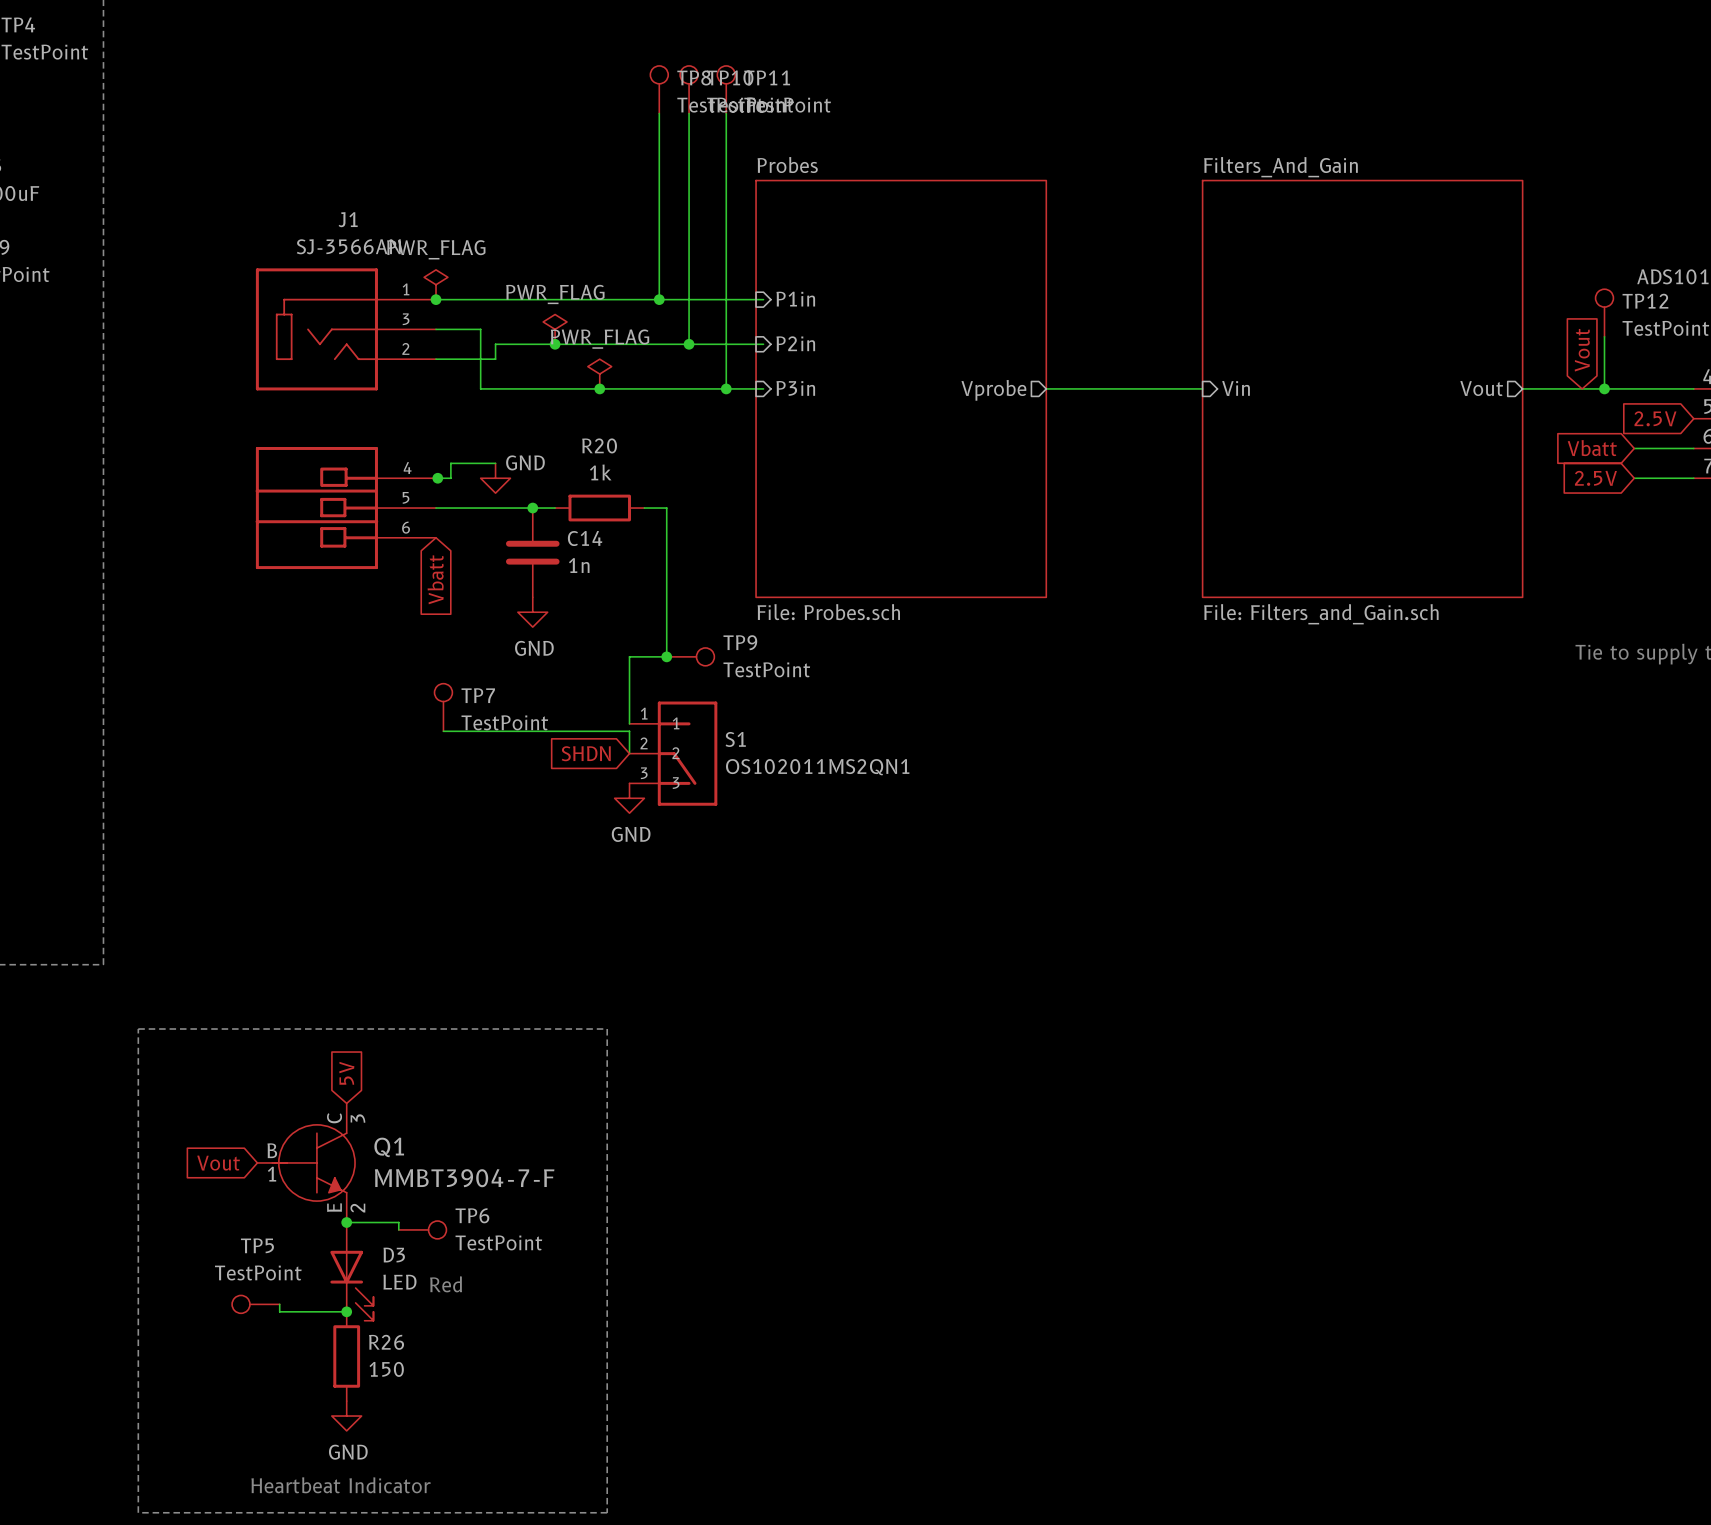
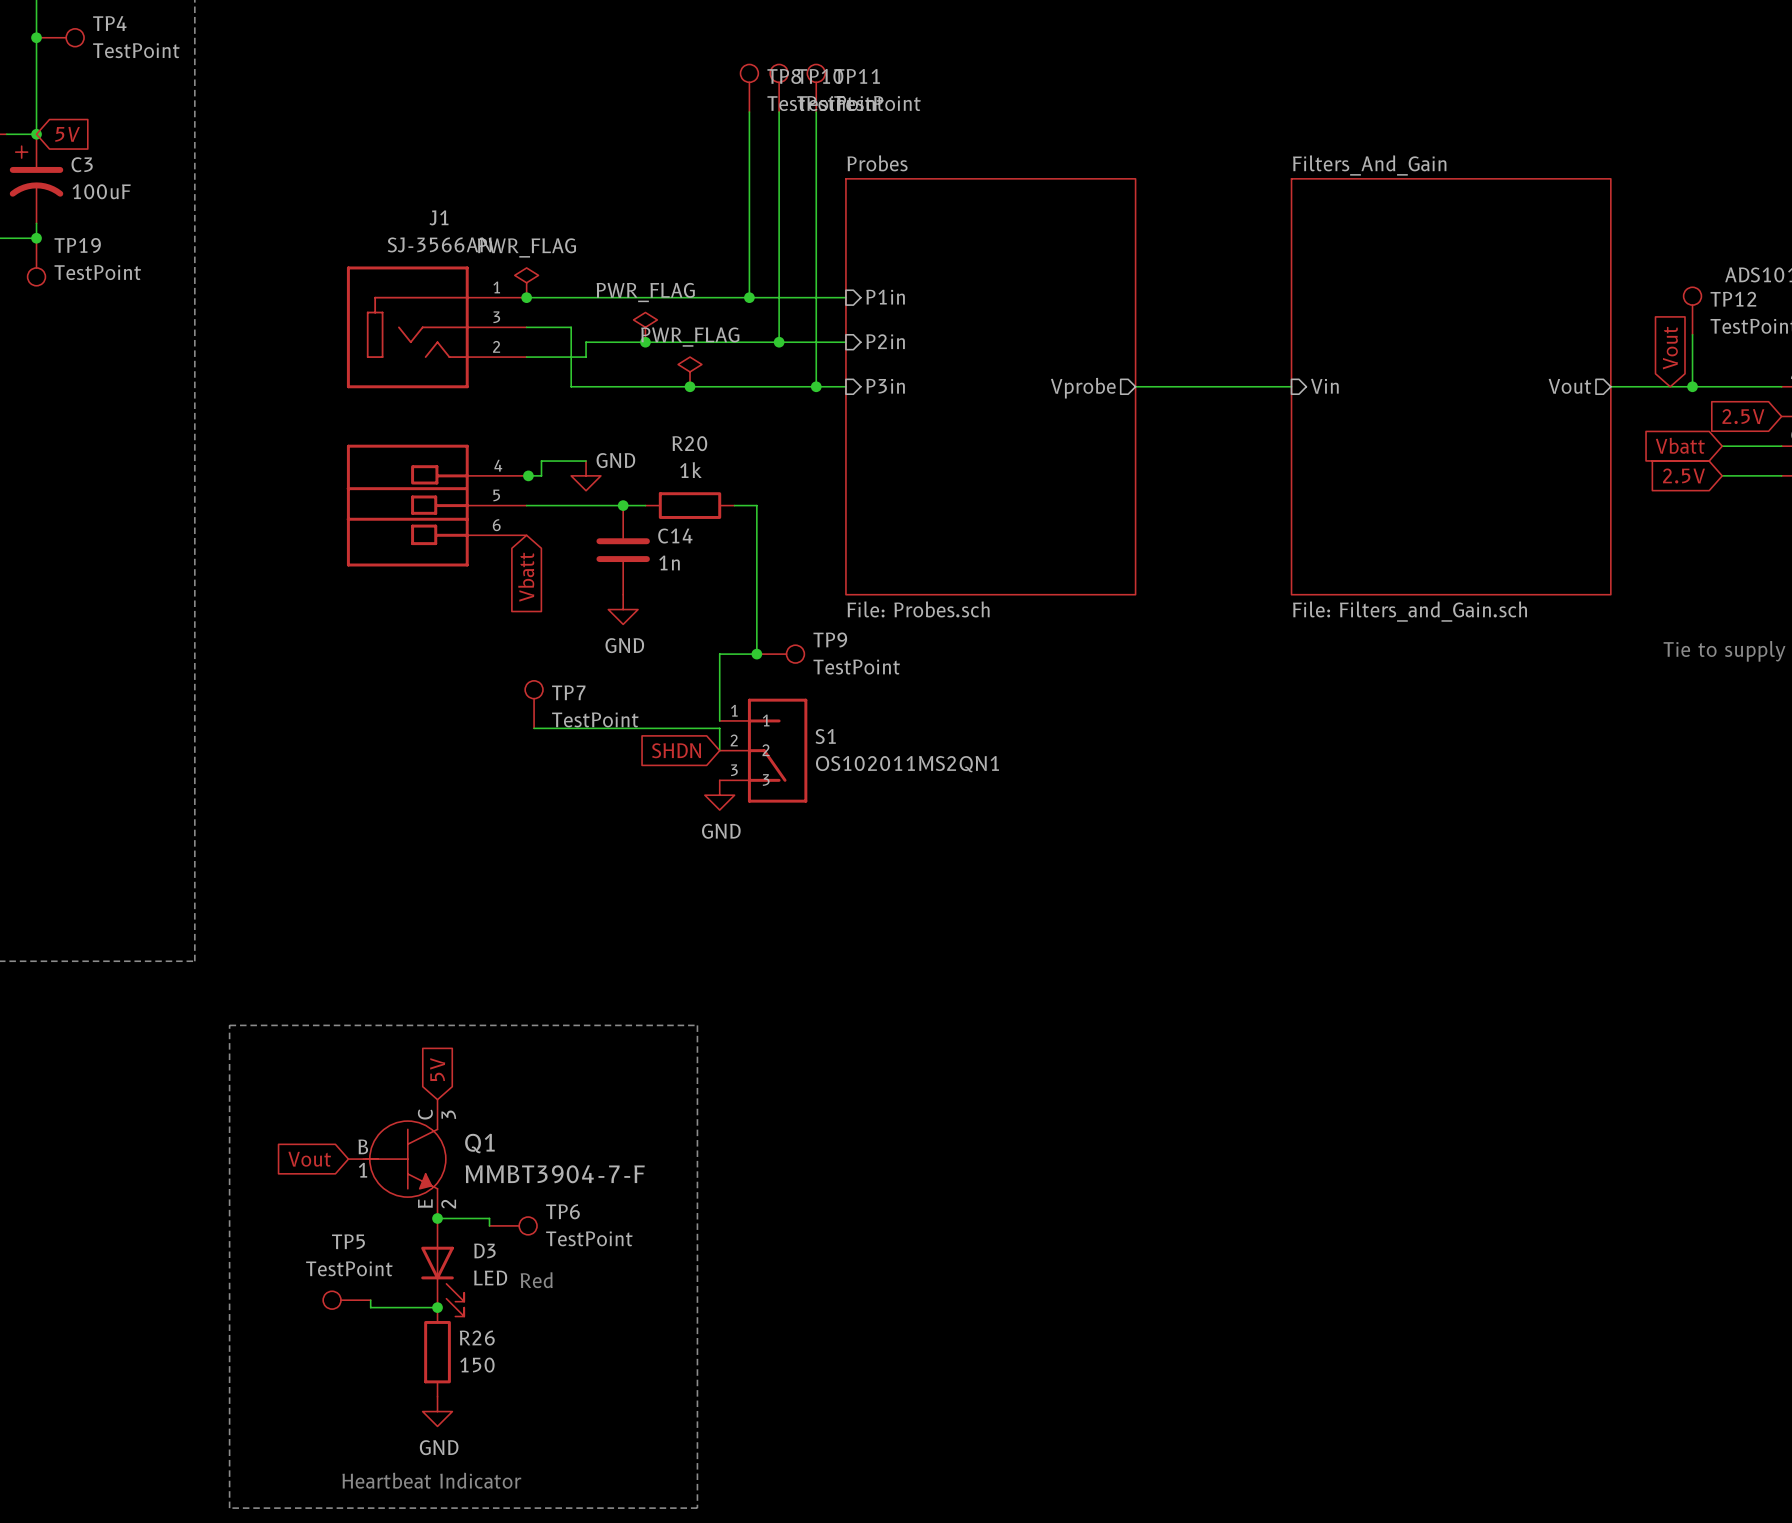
wire: (756, 299) (763, 299) -> none
wire: (756, 344) (763, 344) -> none
wire: (756, 388) (763, 388) -> none

